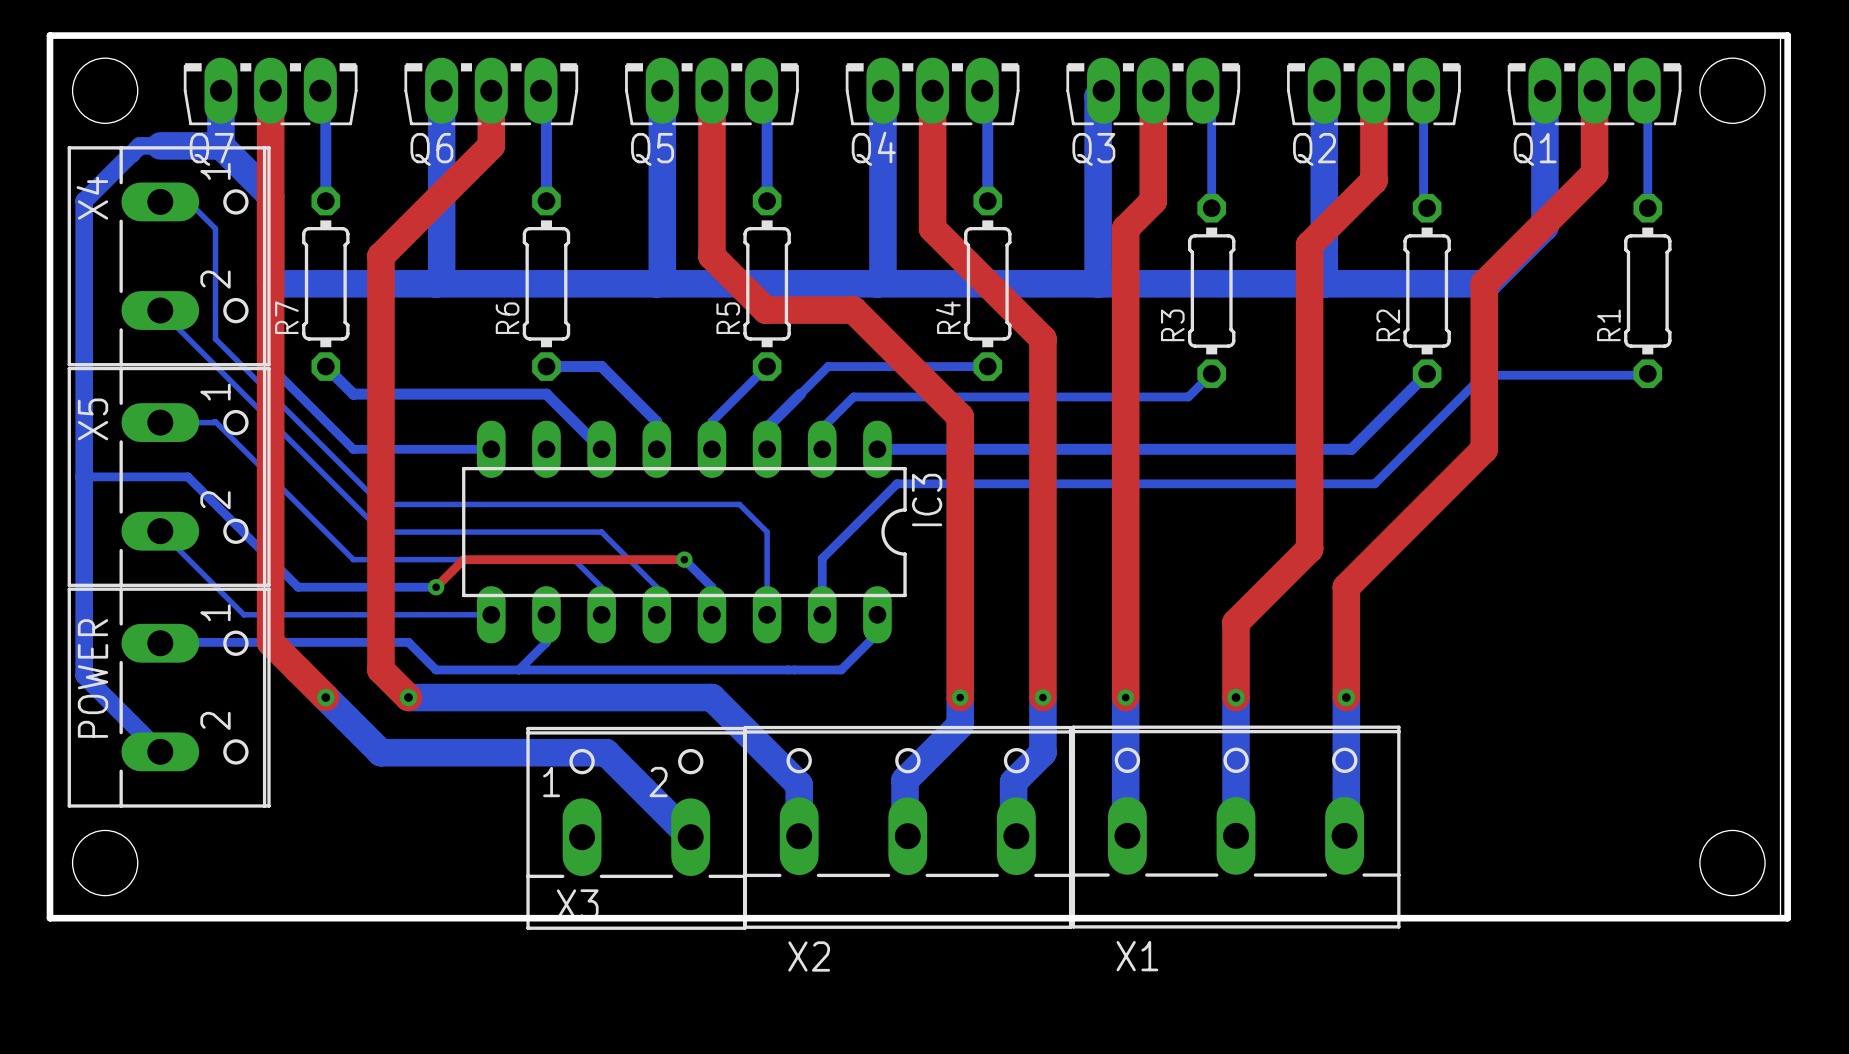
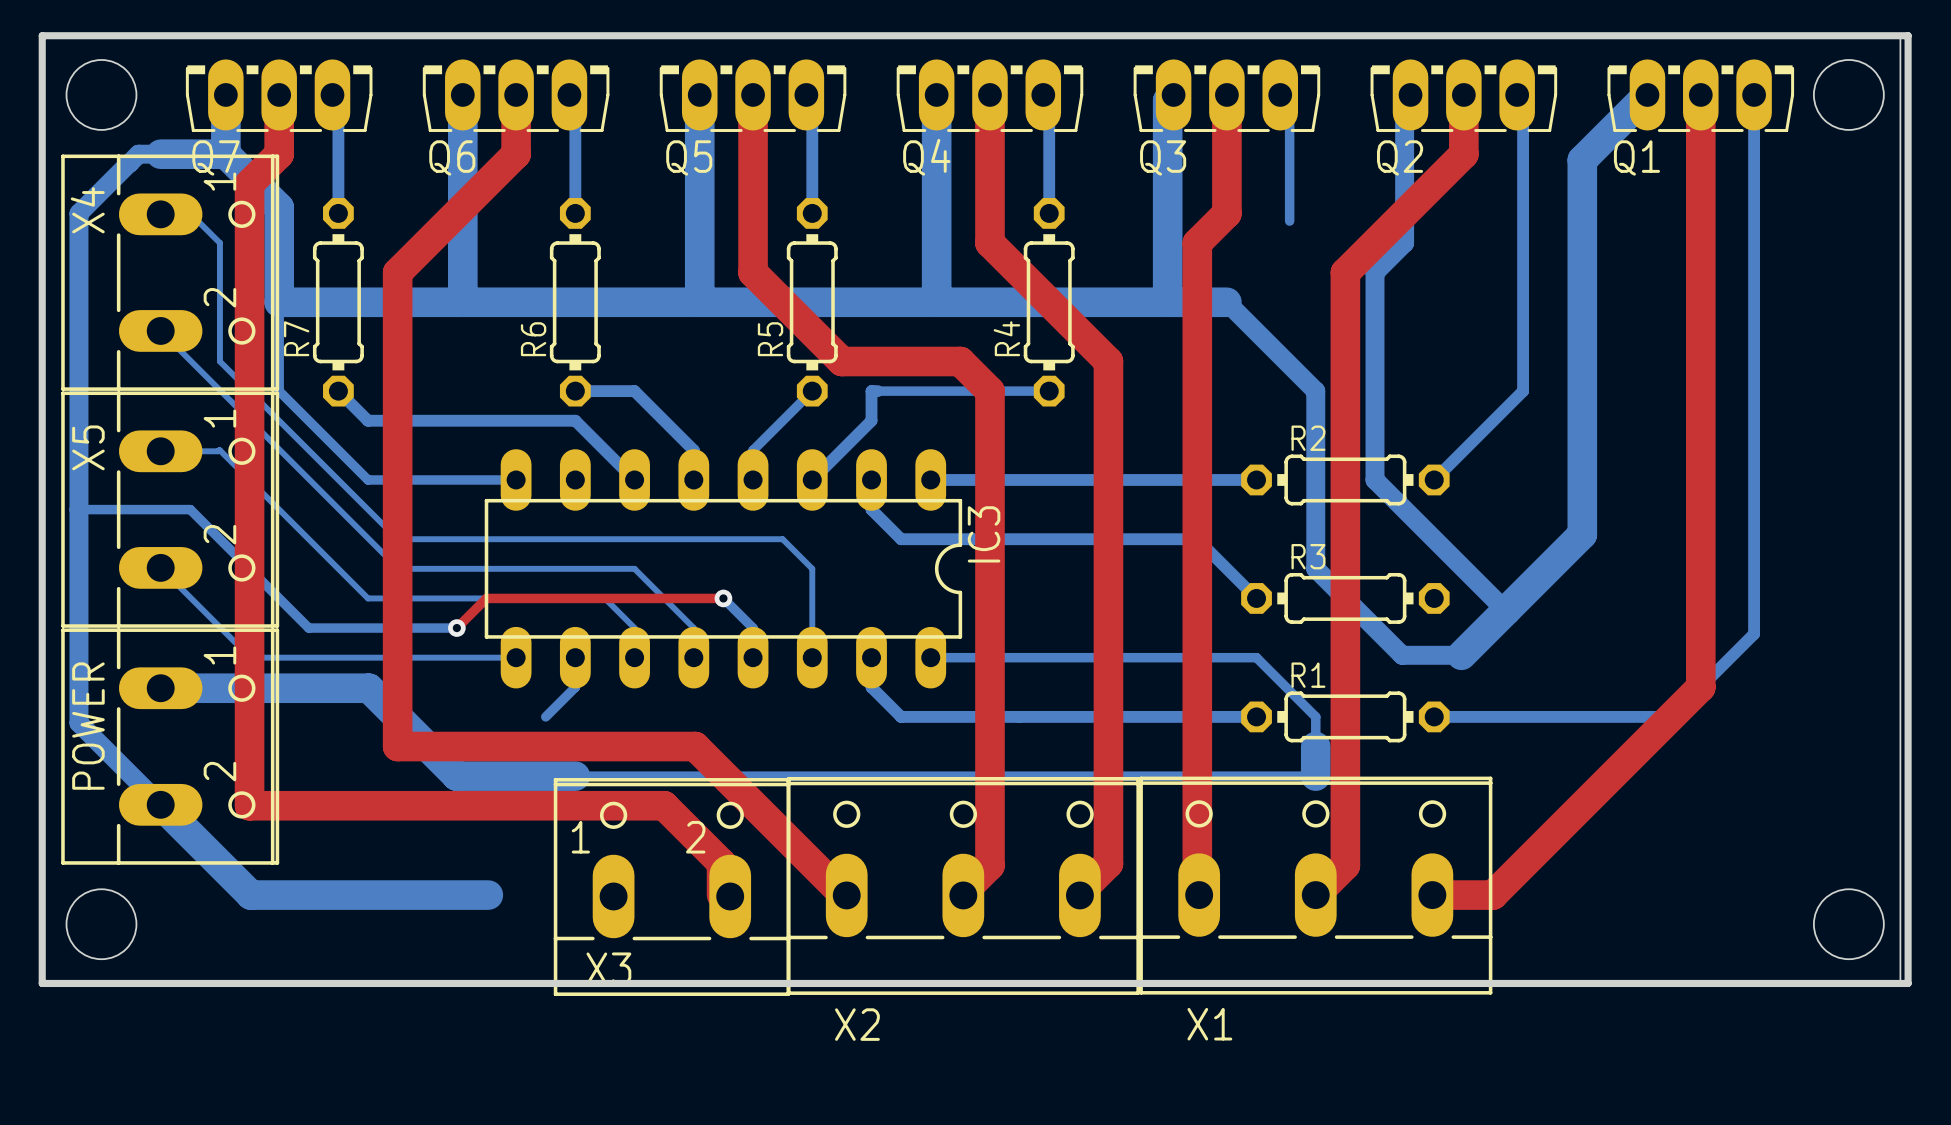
bottom track: (1324, 90) (1324, 283) -> (1410, 94) (1404, 100) (1404, 243) (1375, 272) (1375, 479) (1505, 610)
bottom track: (1423, 90) (1423, 204) (1427, 208) -> (1517, 94) (1523, 100) (1523, 391) (1434, 479)
bottom track: (1544, 90) (1544, 226) (1487, 283) (1153, 283) -> (1647, 94) (1582, 160) (1582, 534) (1461, 655) (1402, 655) (1315, 568) (1315, 391) (1226, 302)
bottom track: (1644, 90) (1647, 94) (1647, 208) -> (1754, 94) (1754, 633) (1671, 716) (1434, 716)
top track: (270, 145) (270, 642) (325, 697) -> (279, 154) (249, 183) (249, 805) (664, 805) (721, 863) (721, 895)
top track: (1373, 145) (1373, 180) (1309, 244) (1309, 548) (1236, 622) (1236, 697) -> (1463, 154) (1345, 272) (1345, 865) (1315, 895)
top track: (1594, 173) (1484, 283) (1484, 449) (1346, 587) (1346, 697) -> (1700, 183) (1700, 687) (1493, 895) (1432, 895)
R3 rotation: 0° (1211, 290) -> 90° clockwise (1345, 598)
R3 position: (1211, 290) -> (1345, 598)
R2 rotation: 0° (1427, 290) -> 90° clockwise (1345, 479)
R2 position: (1427, 290) -> (1345, 479)
R1 rotation: 0° (1647, 290) -> 90° clockwise (1345, 716)
R1 position: (1647, 290) -> (1345, 716)
top track: (765, 310) (853, 310) (960, 416) (960, 697) -> (810, 330) (841, 361) (960, 361) (989, 391) (989, 865) (960, 895)
bottom track: (828, 366) (767, 427) (767, 449) -> (877, 391) (871, 391) (871, 420) (812, 479)
bottom track: (1211, 373) (1188, 396) (853, 396) (822, 428) (822, 449) -> (1256, 598) (1197, 539) (901, 539) (871, 509) (871, 479)
bottom track: (1427, 373) (1351, 449) (1180, 449) -> none
bottom track: (1647, 373) (1646, 375) (1483, 375) (1374, 483) (896, 483) (822, 558) (822, 614) -> (1256, 716) (901, 716) (871, 687) (871, 657)
bottom track: (877, 614) (877, 633) (841, 669) (436, 669) (408, 642) (160, 643) -> (1315, 776) (456, 776) (368, 688) (160, 688)
bottom track: none -> (930, 657) (1256, 657) (1315, 716) (1315, 746)
top track: (380, 669) (408, 697) -> (397, 716) (397, 746) (695, 746) (843, 895)
bottom track: (325, 697) (380, 752) (606, 752) (690, 837) -> none
via: (325, 697) -> none
bottom track: (408, 697) (711, 697) (799, 784) (799, 836) -> none
via: (408, 697) -> none
bottom track: (960, 697) (960, 725) (905, 780) (905, 833) (907, 836) -> none
via: (960, 697) -> none
bottom track: (1042, 697) (1042, 752) (1013, 782) (1013, 833) (1016, 836) -> none
top track: none -> (1108, 746) (1108, 863) (1076, 895)
via: (1042, 697) -> none
bottom track: (1125, 697) (1125, 834) (1127, 835) -> none
top track: none -> (1197, 746) (1197, 893) (1199, 895)
via: (1125, 697) -> none
via: (1236, 697) -> none
bottom track: (1346, 697) (1346, 834) (1344, 835) -> none
via: (1346, 697) -> none
bottom track: (1236, 725) (1236, 835) -> none
bottom track: none -> (160, 804) (250, 895) (488, 895)

